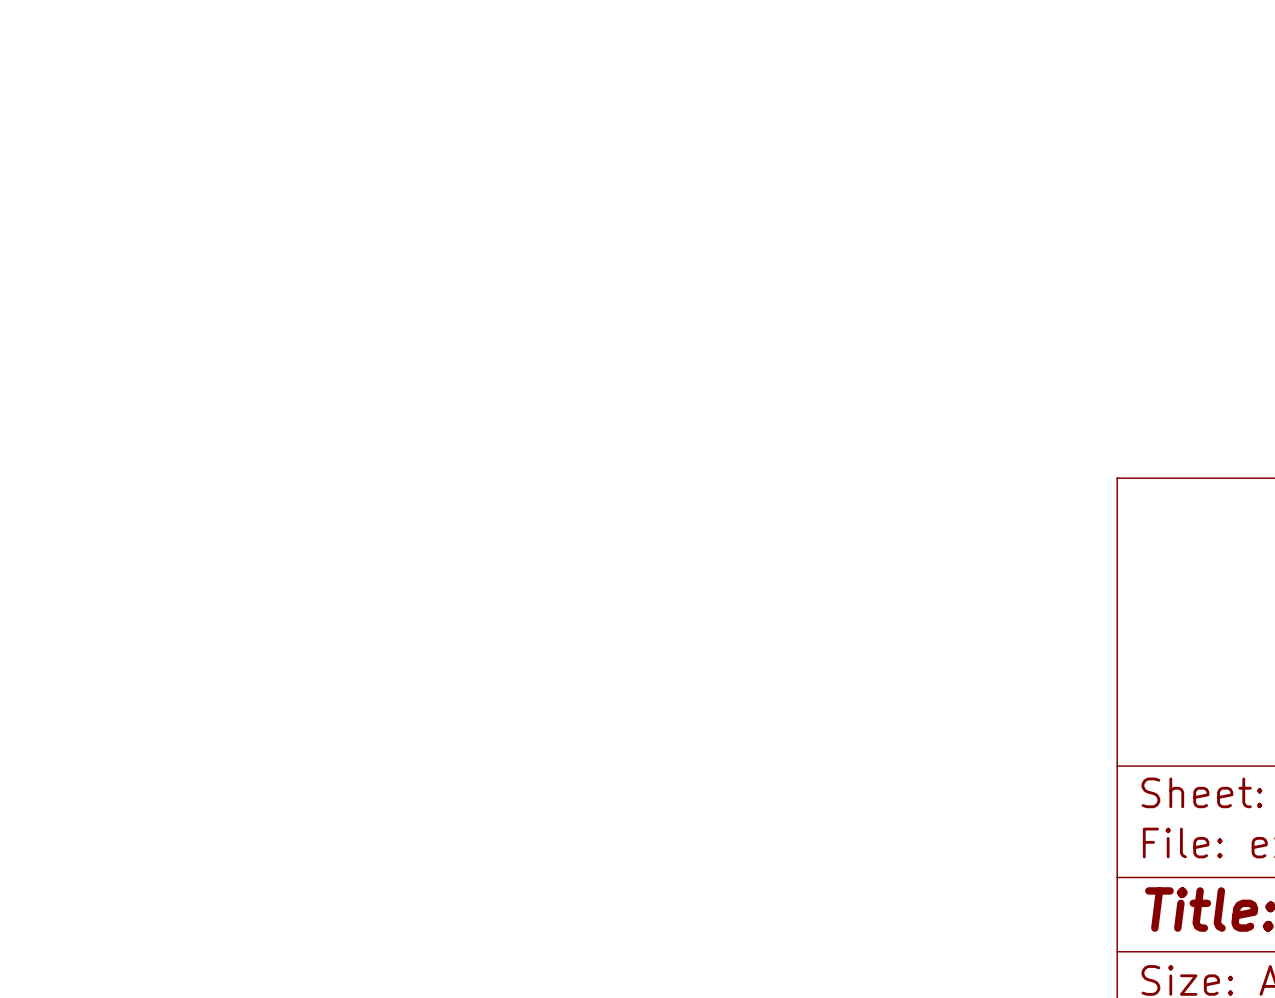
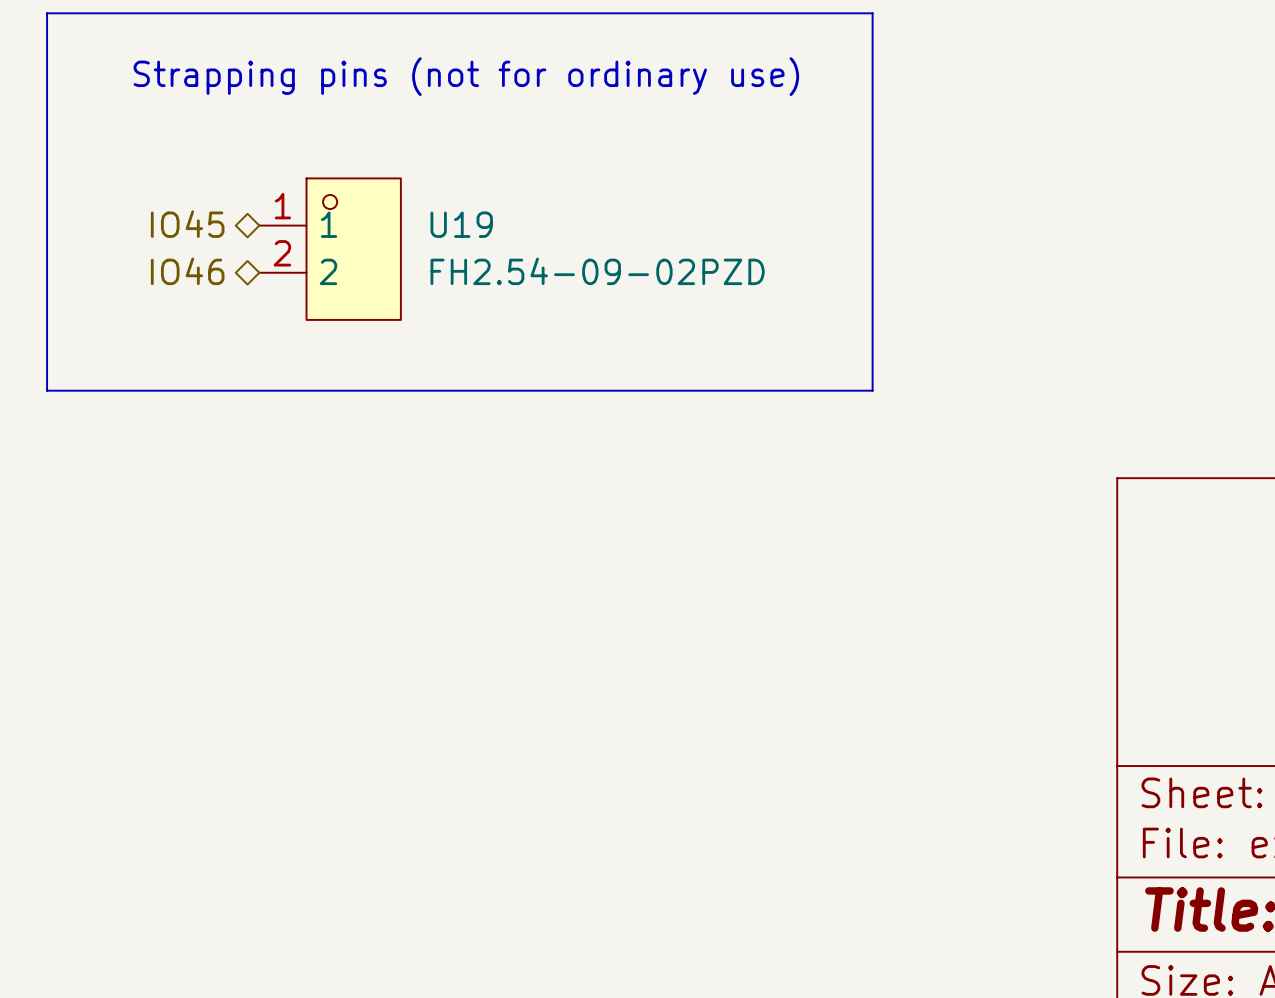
line: none -> (47, 13) (872, 13) (872, 390) (47, 390) (47, 13)
text: none -> Strapping pins (not for ordinary use) (466, 76)
hierarchical label: none -> IO45 (187, 224)
U19: none -> FH2.54-09-02PZD (330, 249)
hierarchical label: none -> IO46 (187, 271)

